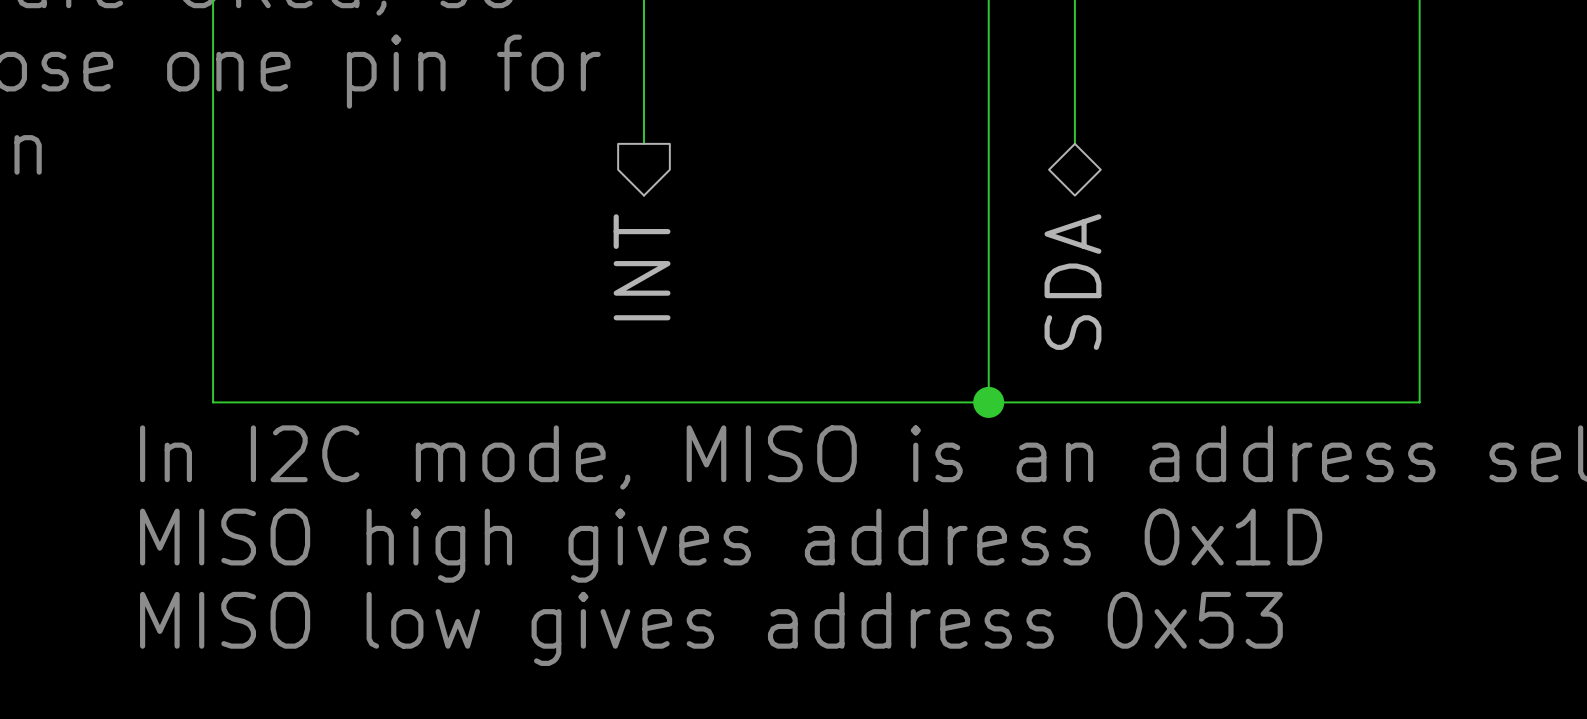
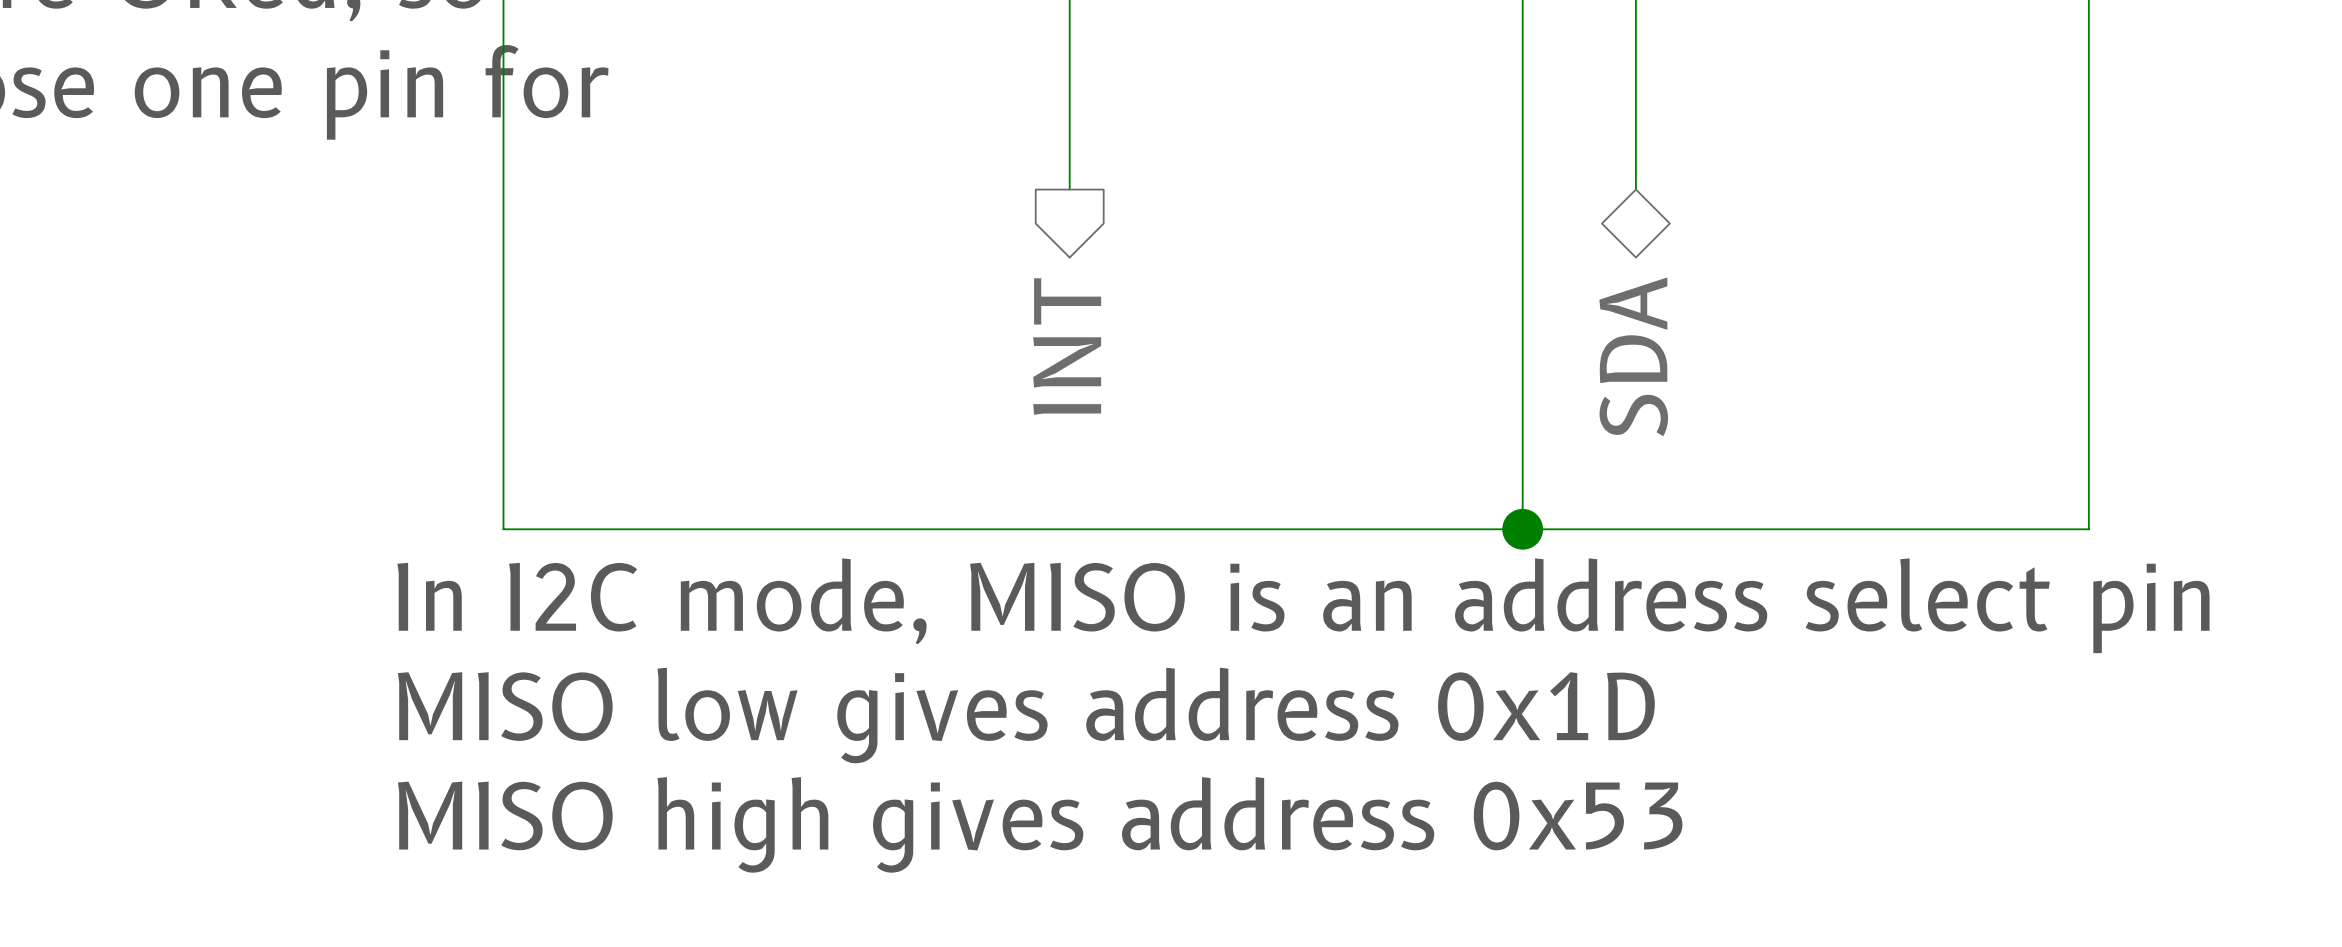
text: MISO high gives address 0x1D (731, 545) -> MISO low gives address 0x1D (1026, 715)
text: MISO low gives address 0x53 (711, 628) -> MISO high gives address 0x53 (1040, 824)

